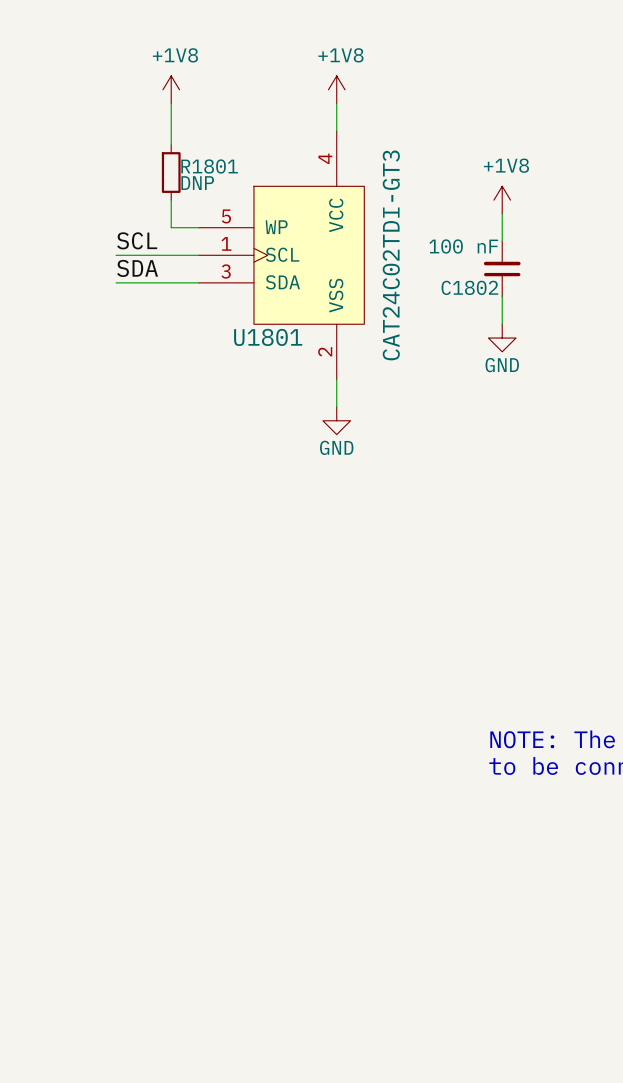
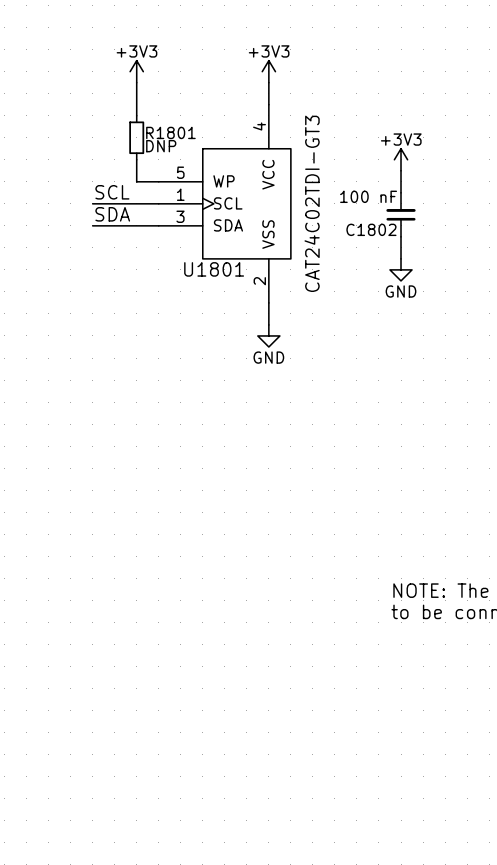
power symbol: +1V8 (171, 89) -> +3V3 (136, 71)
power symbol: +1V8 (336, 89) -> +3V3 (268, 71)
power symbol: +1V8 (502, 200) -> +3V3 (401, 159)

